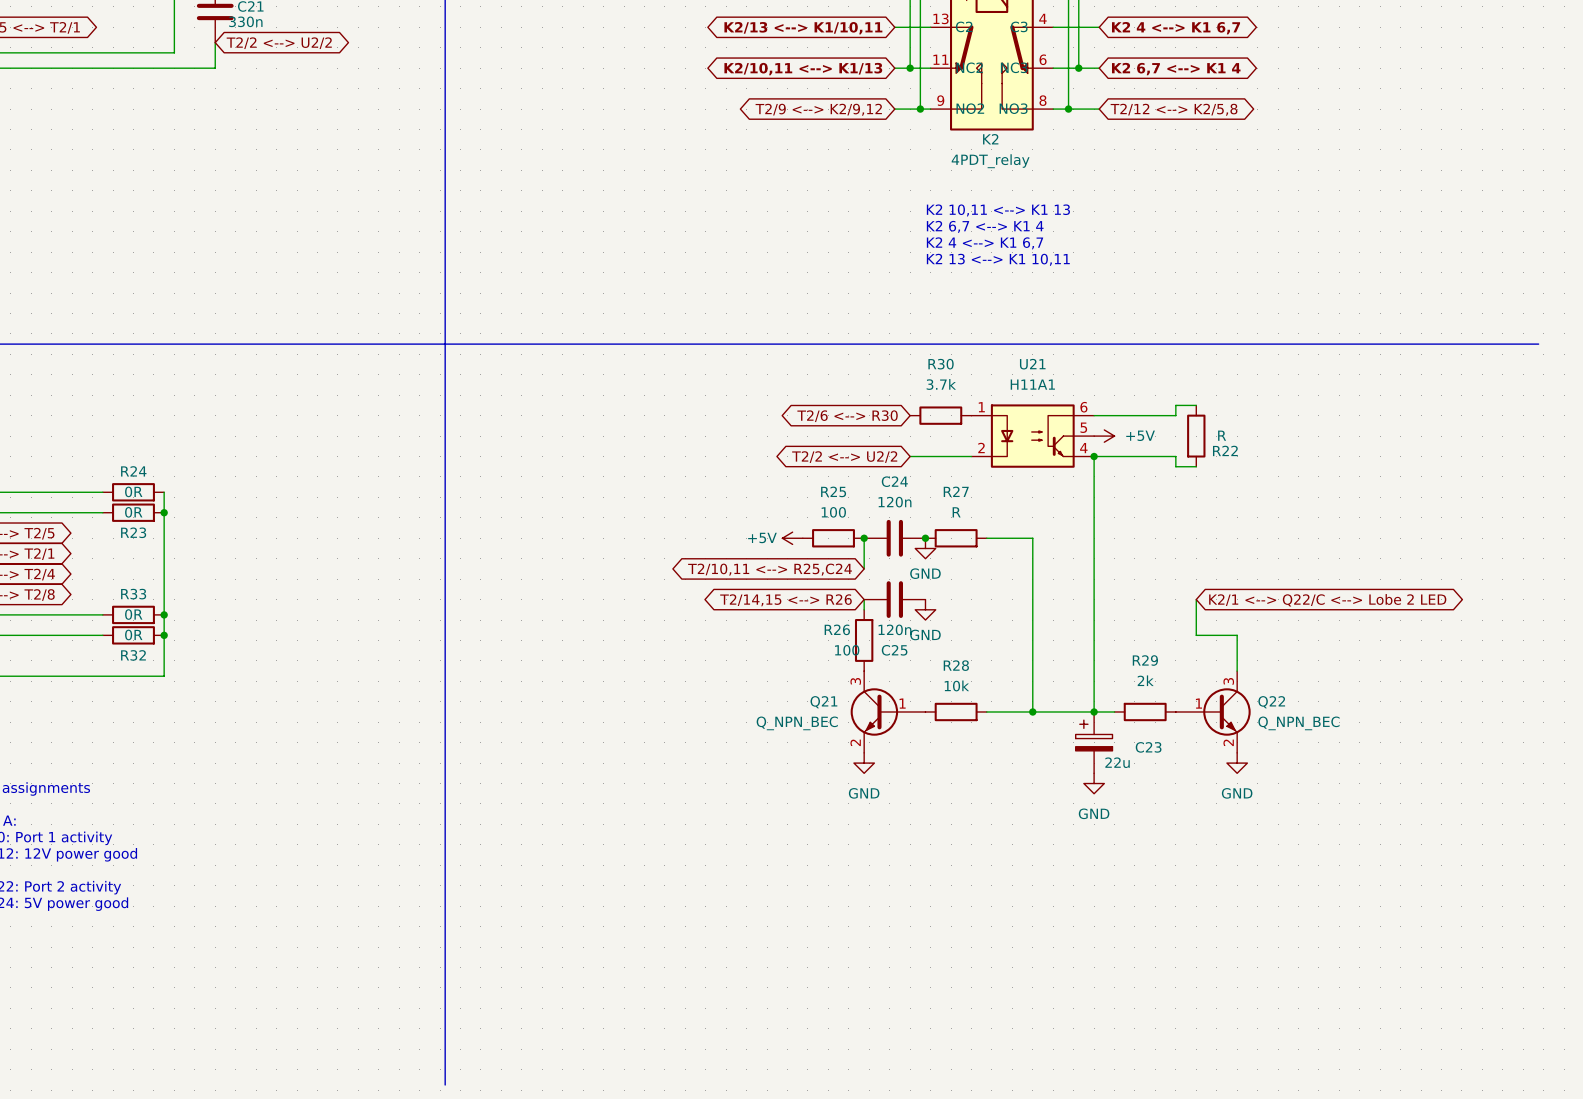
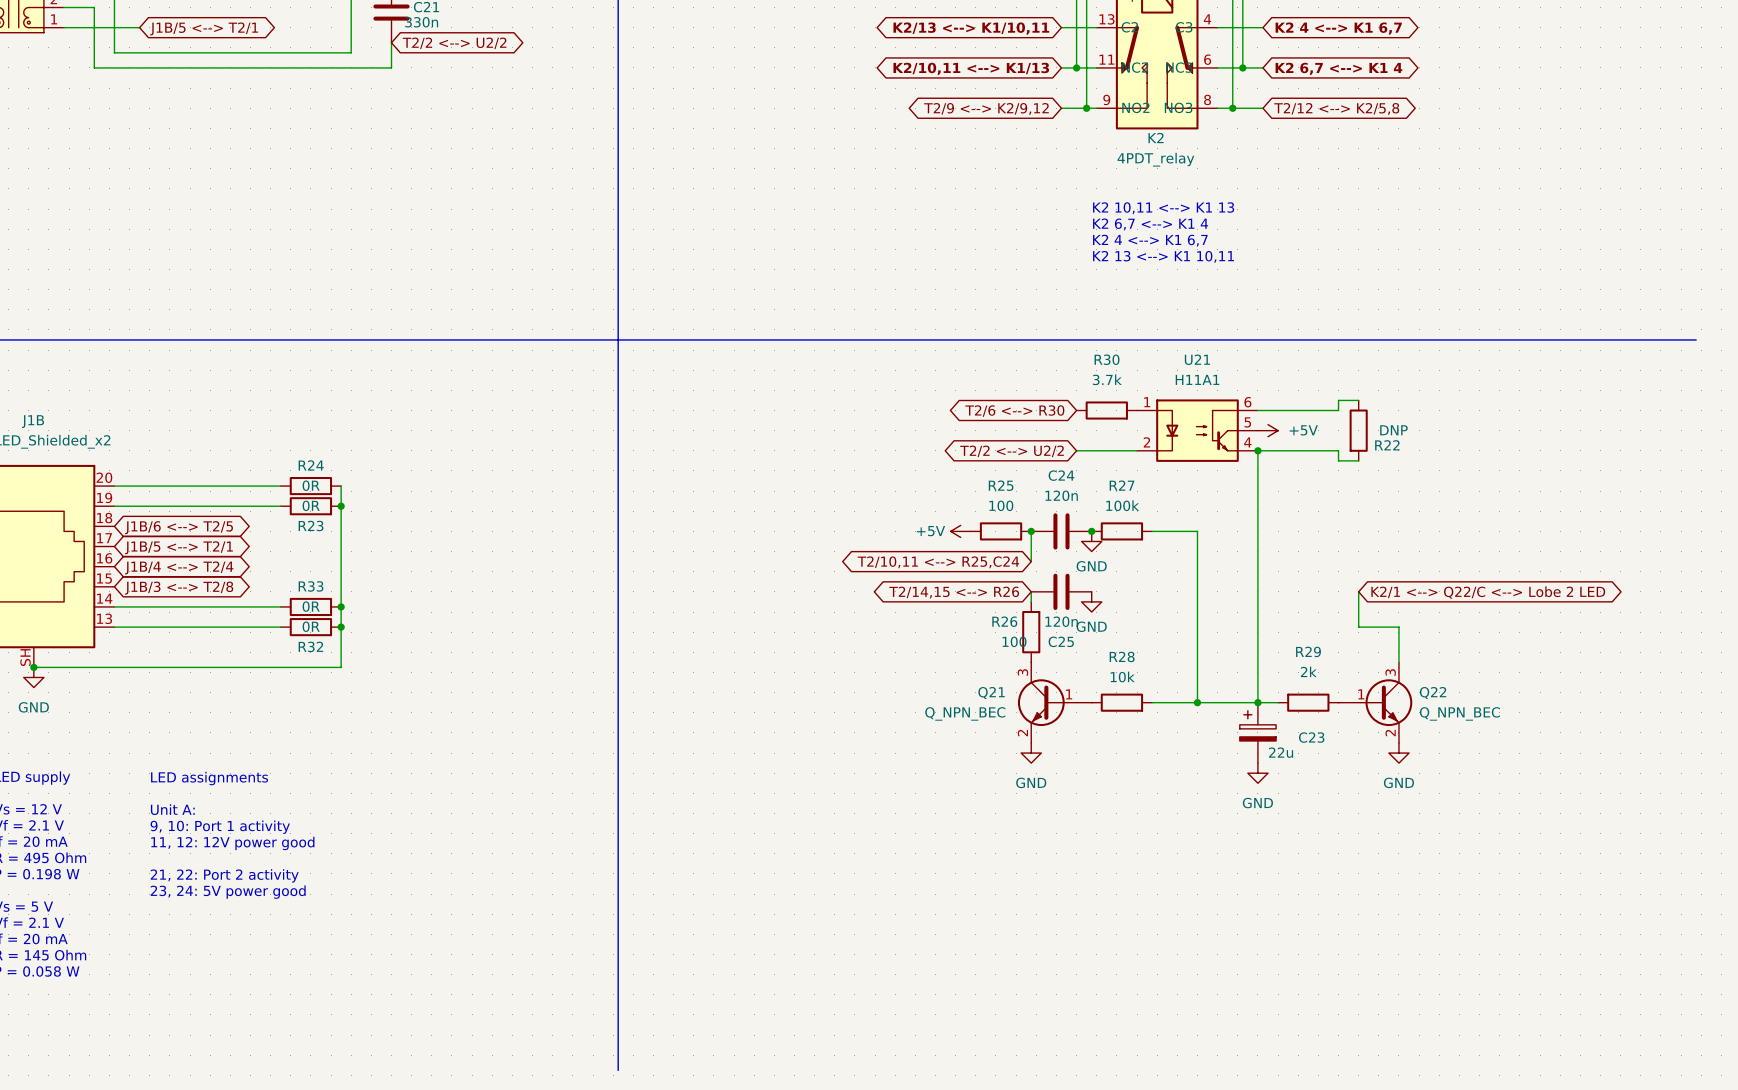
R22 value: R (1222, 435) -> DNP (1393, 430)
R27 value: R (956, 512) -> 100k (1122, 505)

